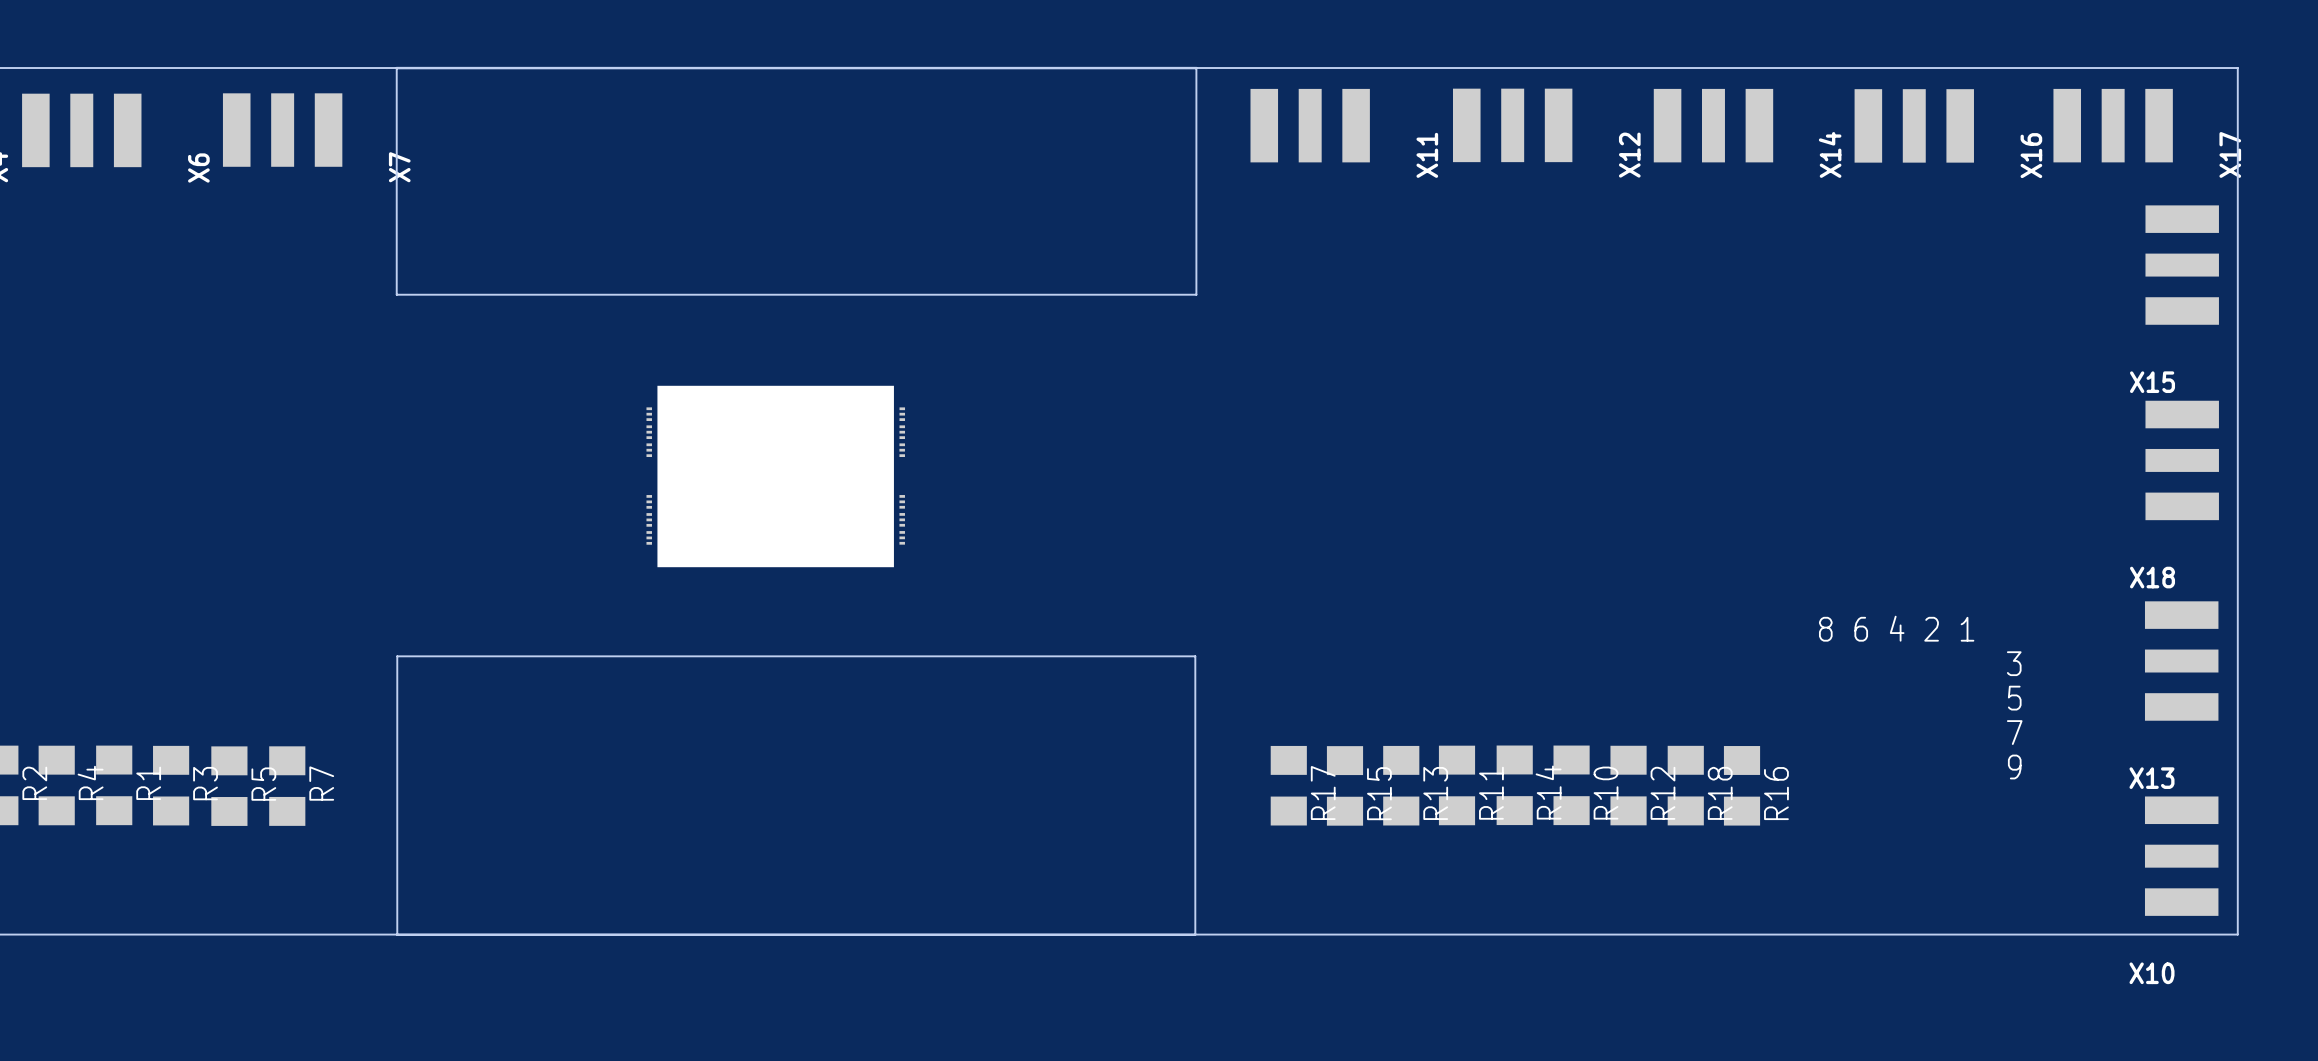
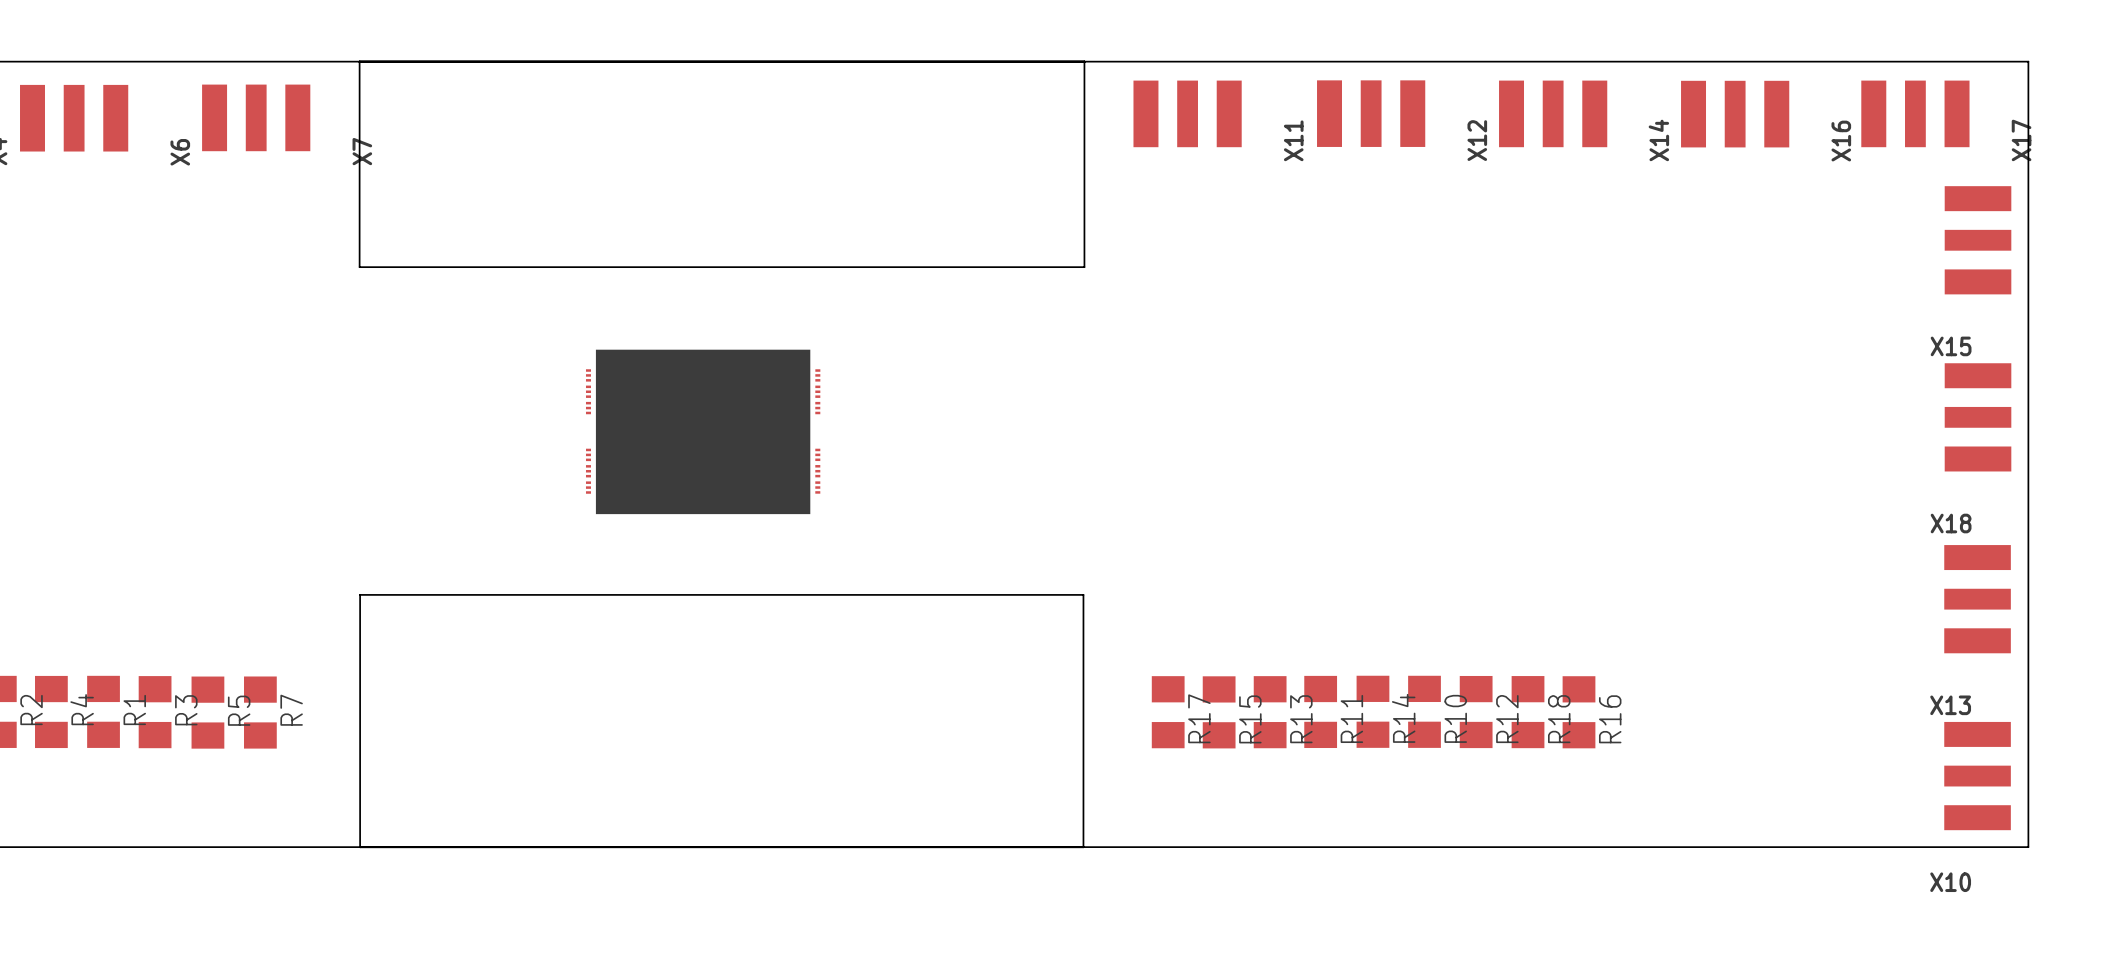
text: 8 6 4 2 1 (1896, 628) -> none
text: 3 (2014, 663) -> none
text: 5 (2014, 698) -> none
text: 7 (2014, 732) -> none
text: 9 (2014, 767) -> none

